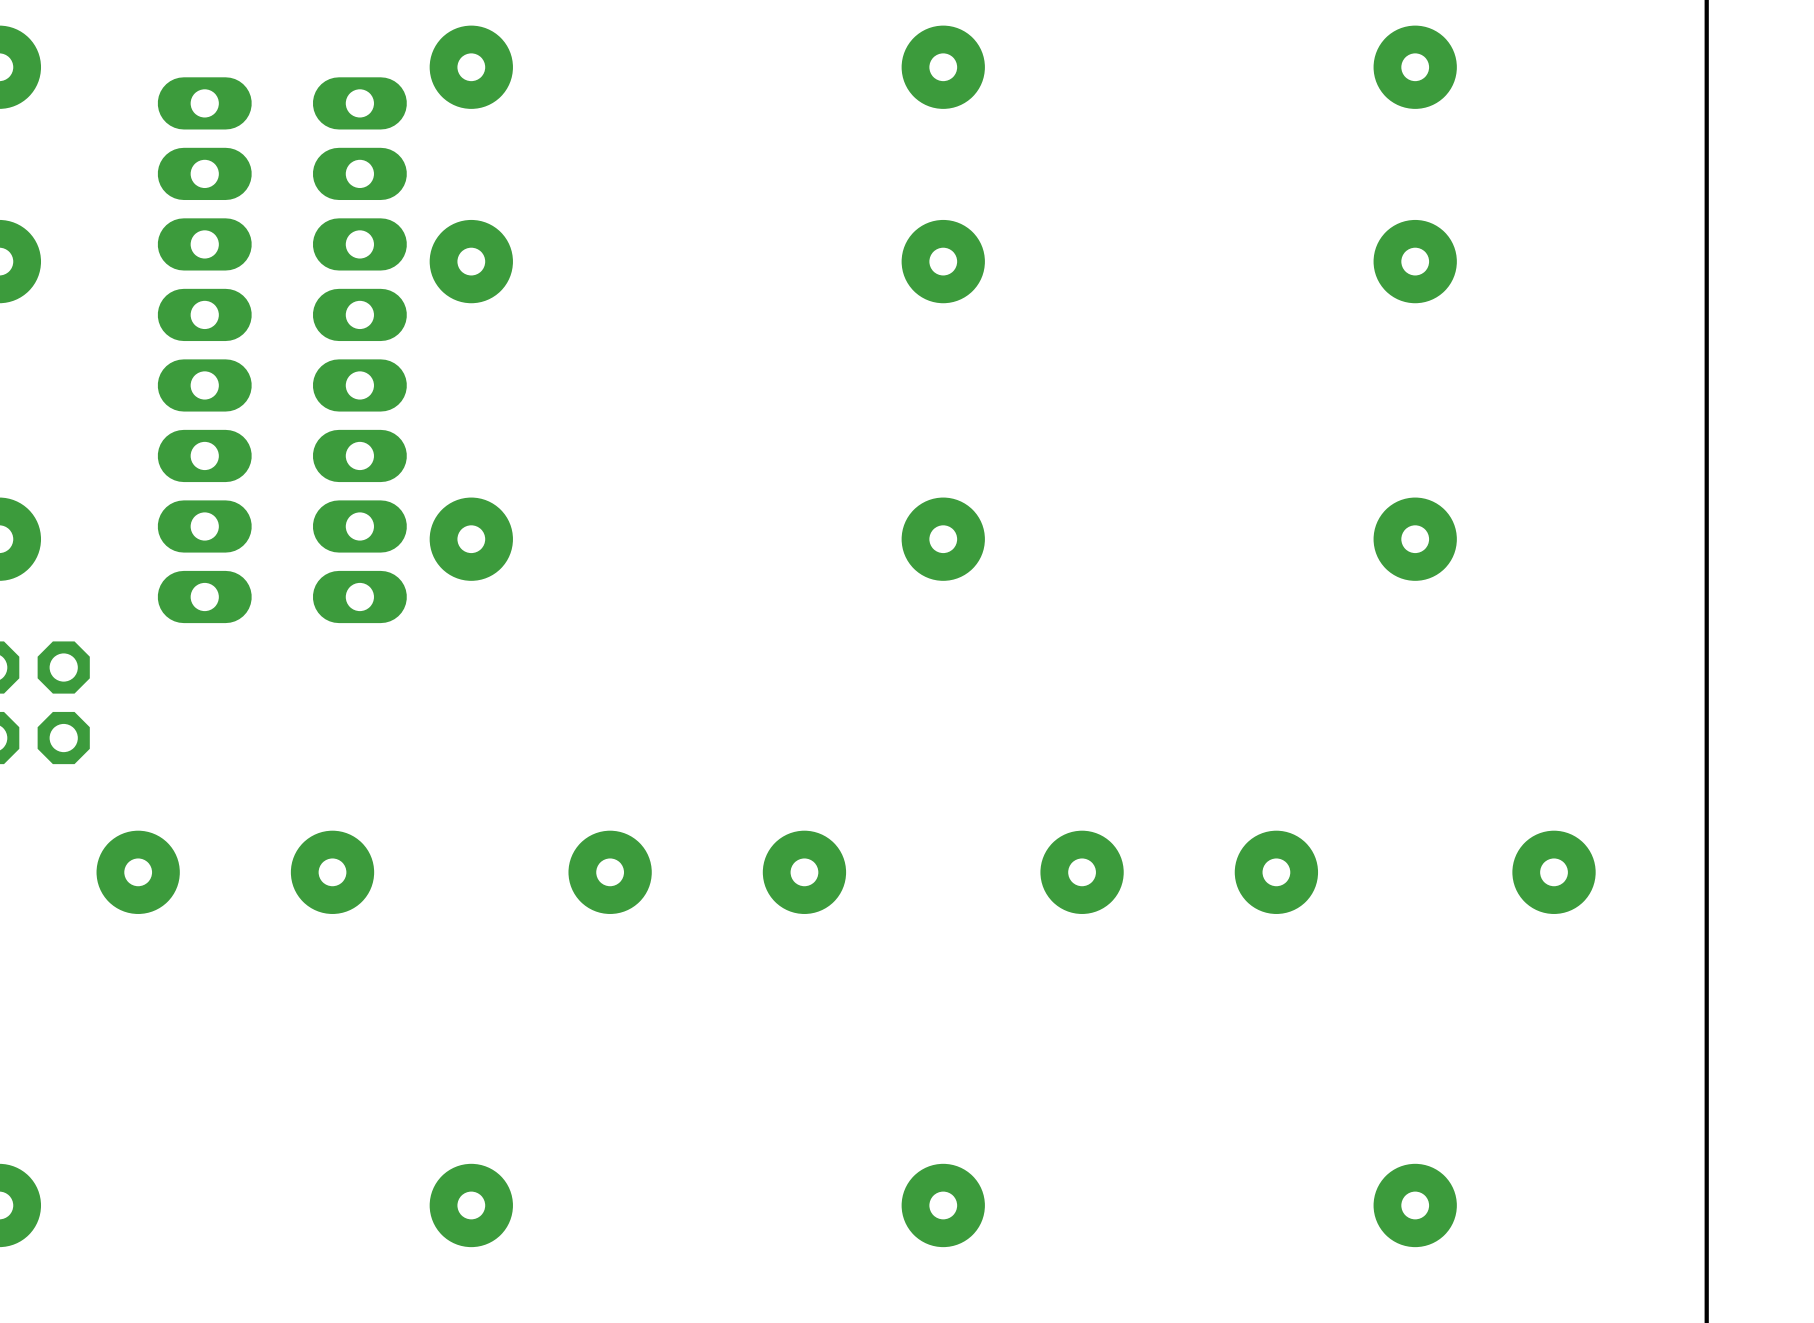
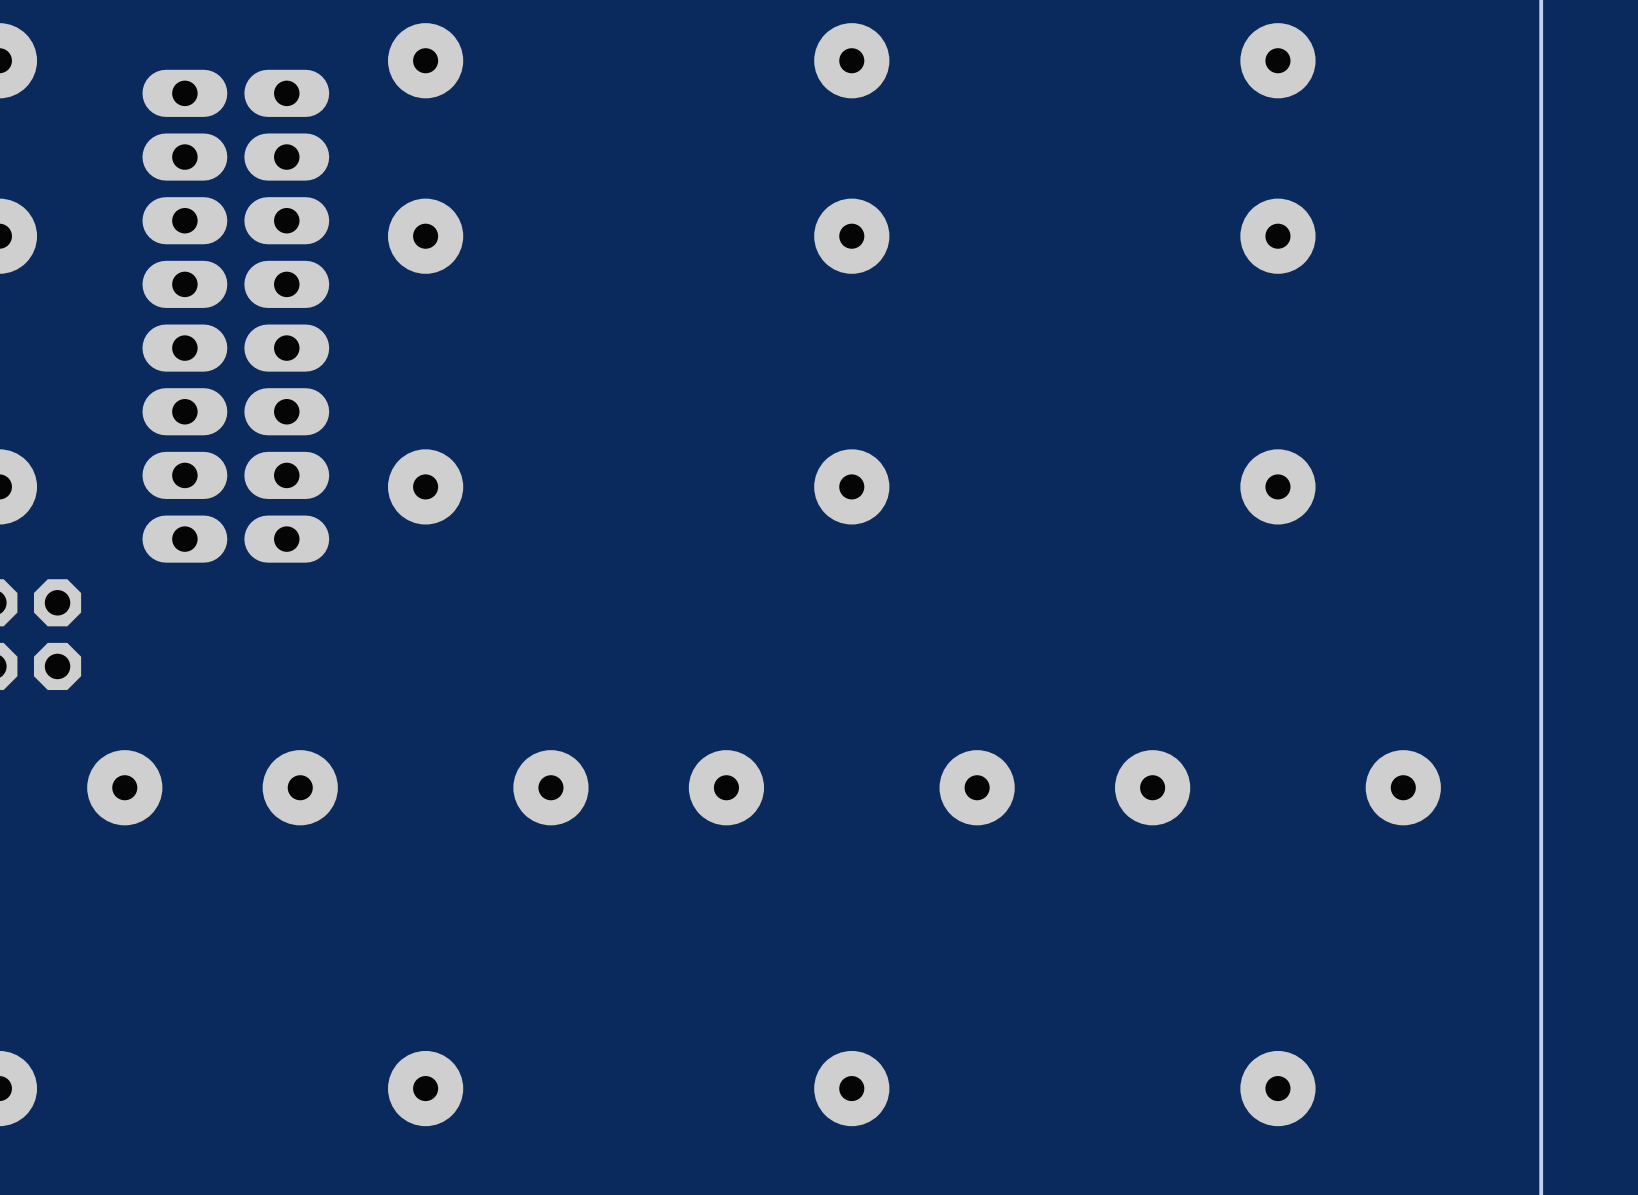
part position: (359, 350) -> (286, 316)

